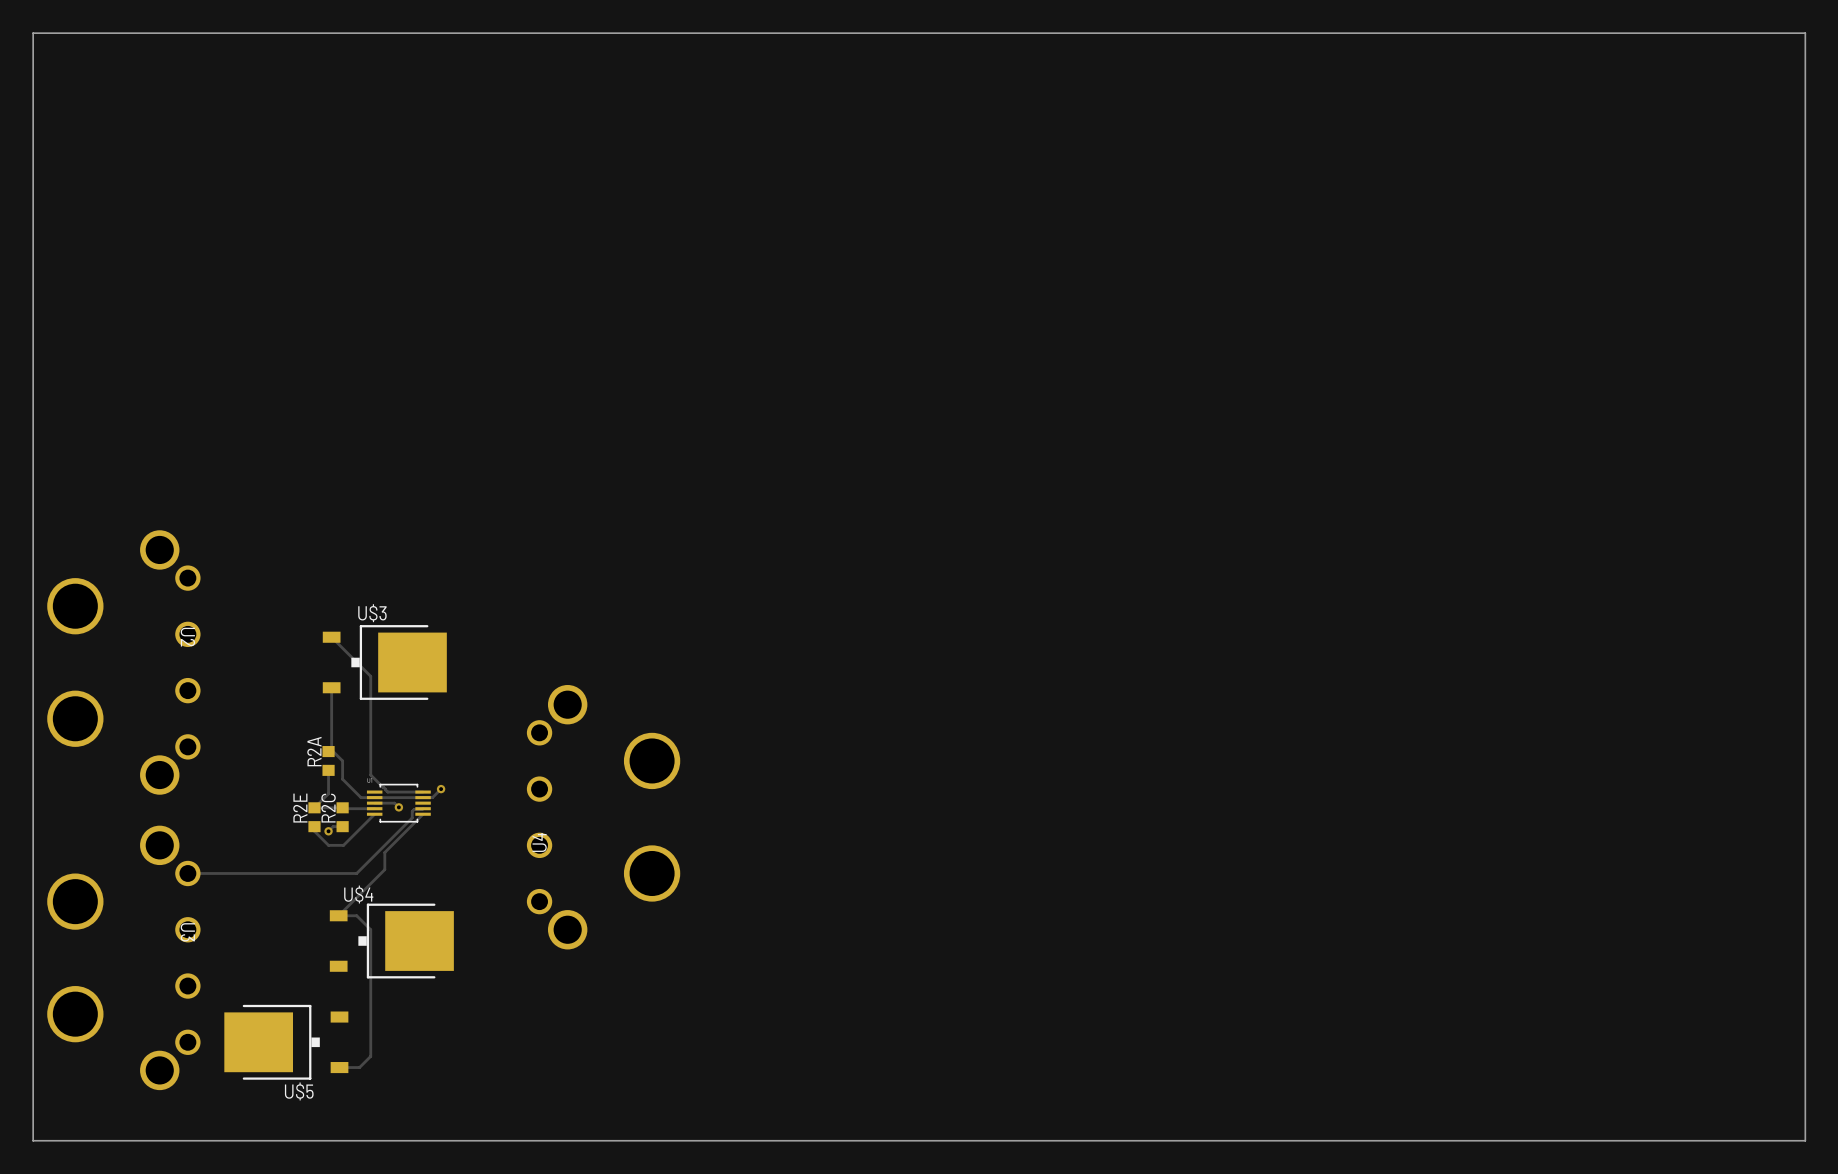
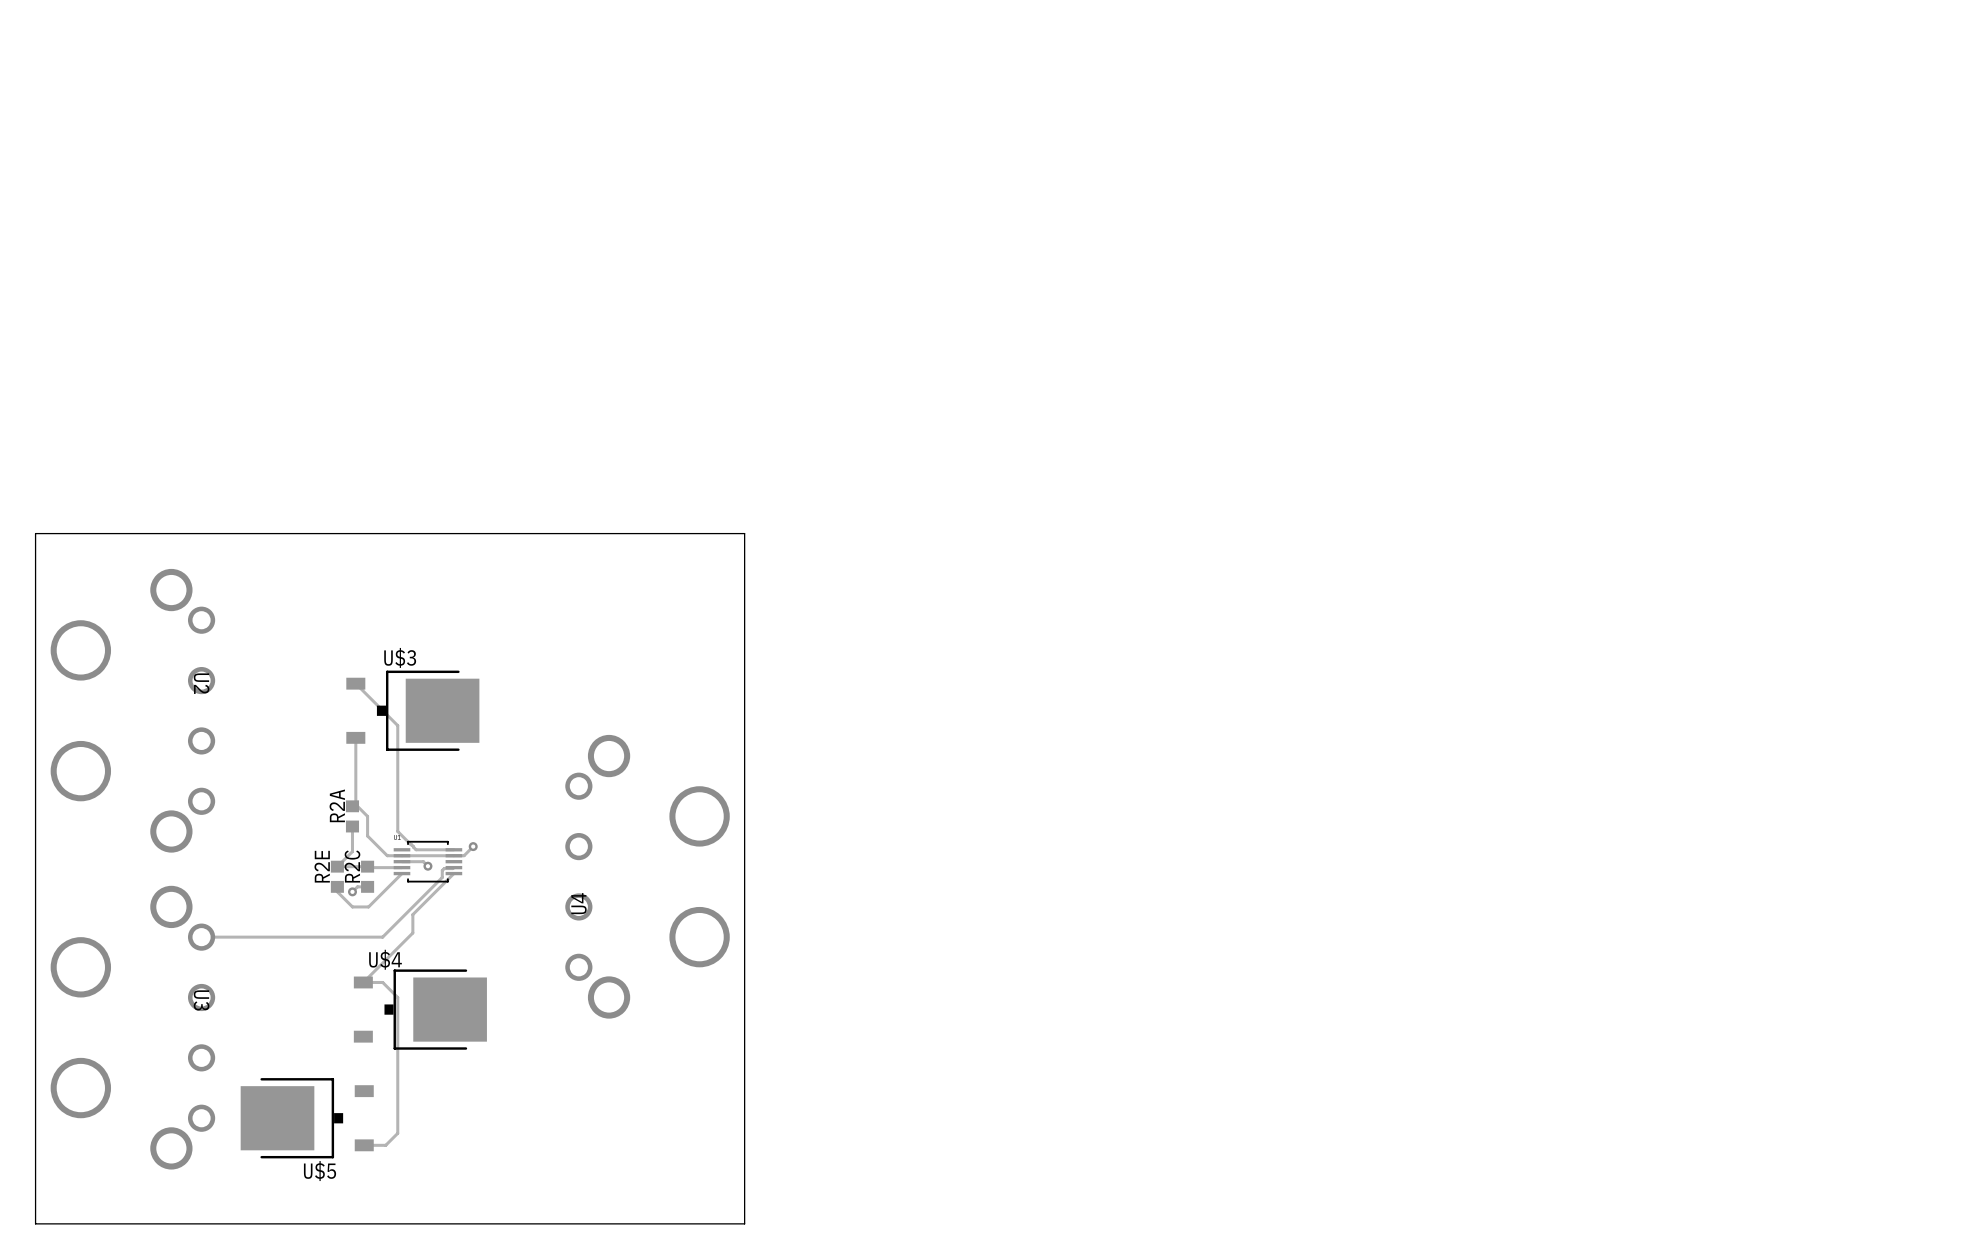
board edge: (33, 497) (33, 33) (1805, 33) (1805, 1140) (694, 1140) -> (35, 533) (744, 533) (744, 1223)

